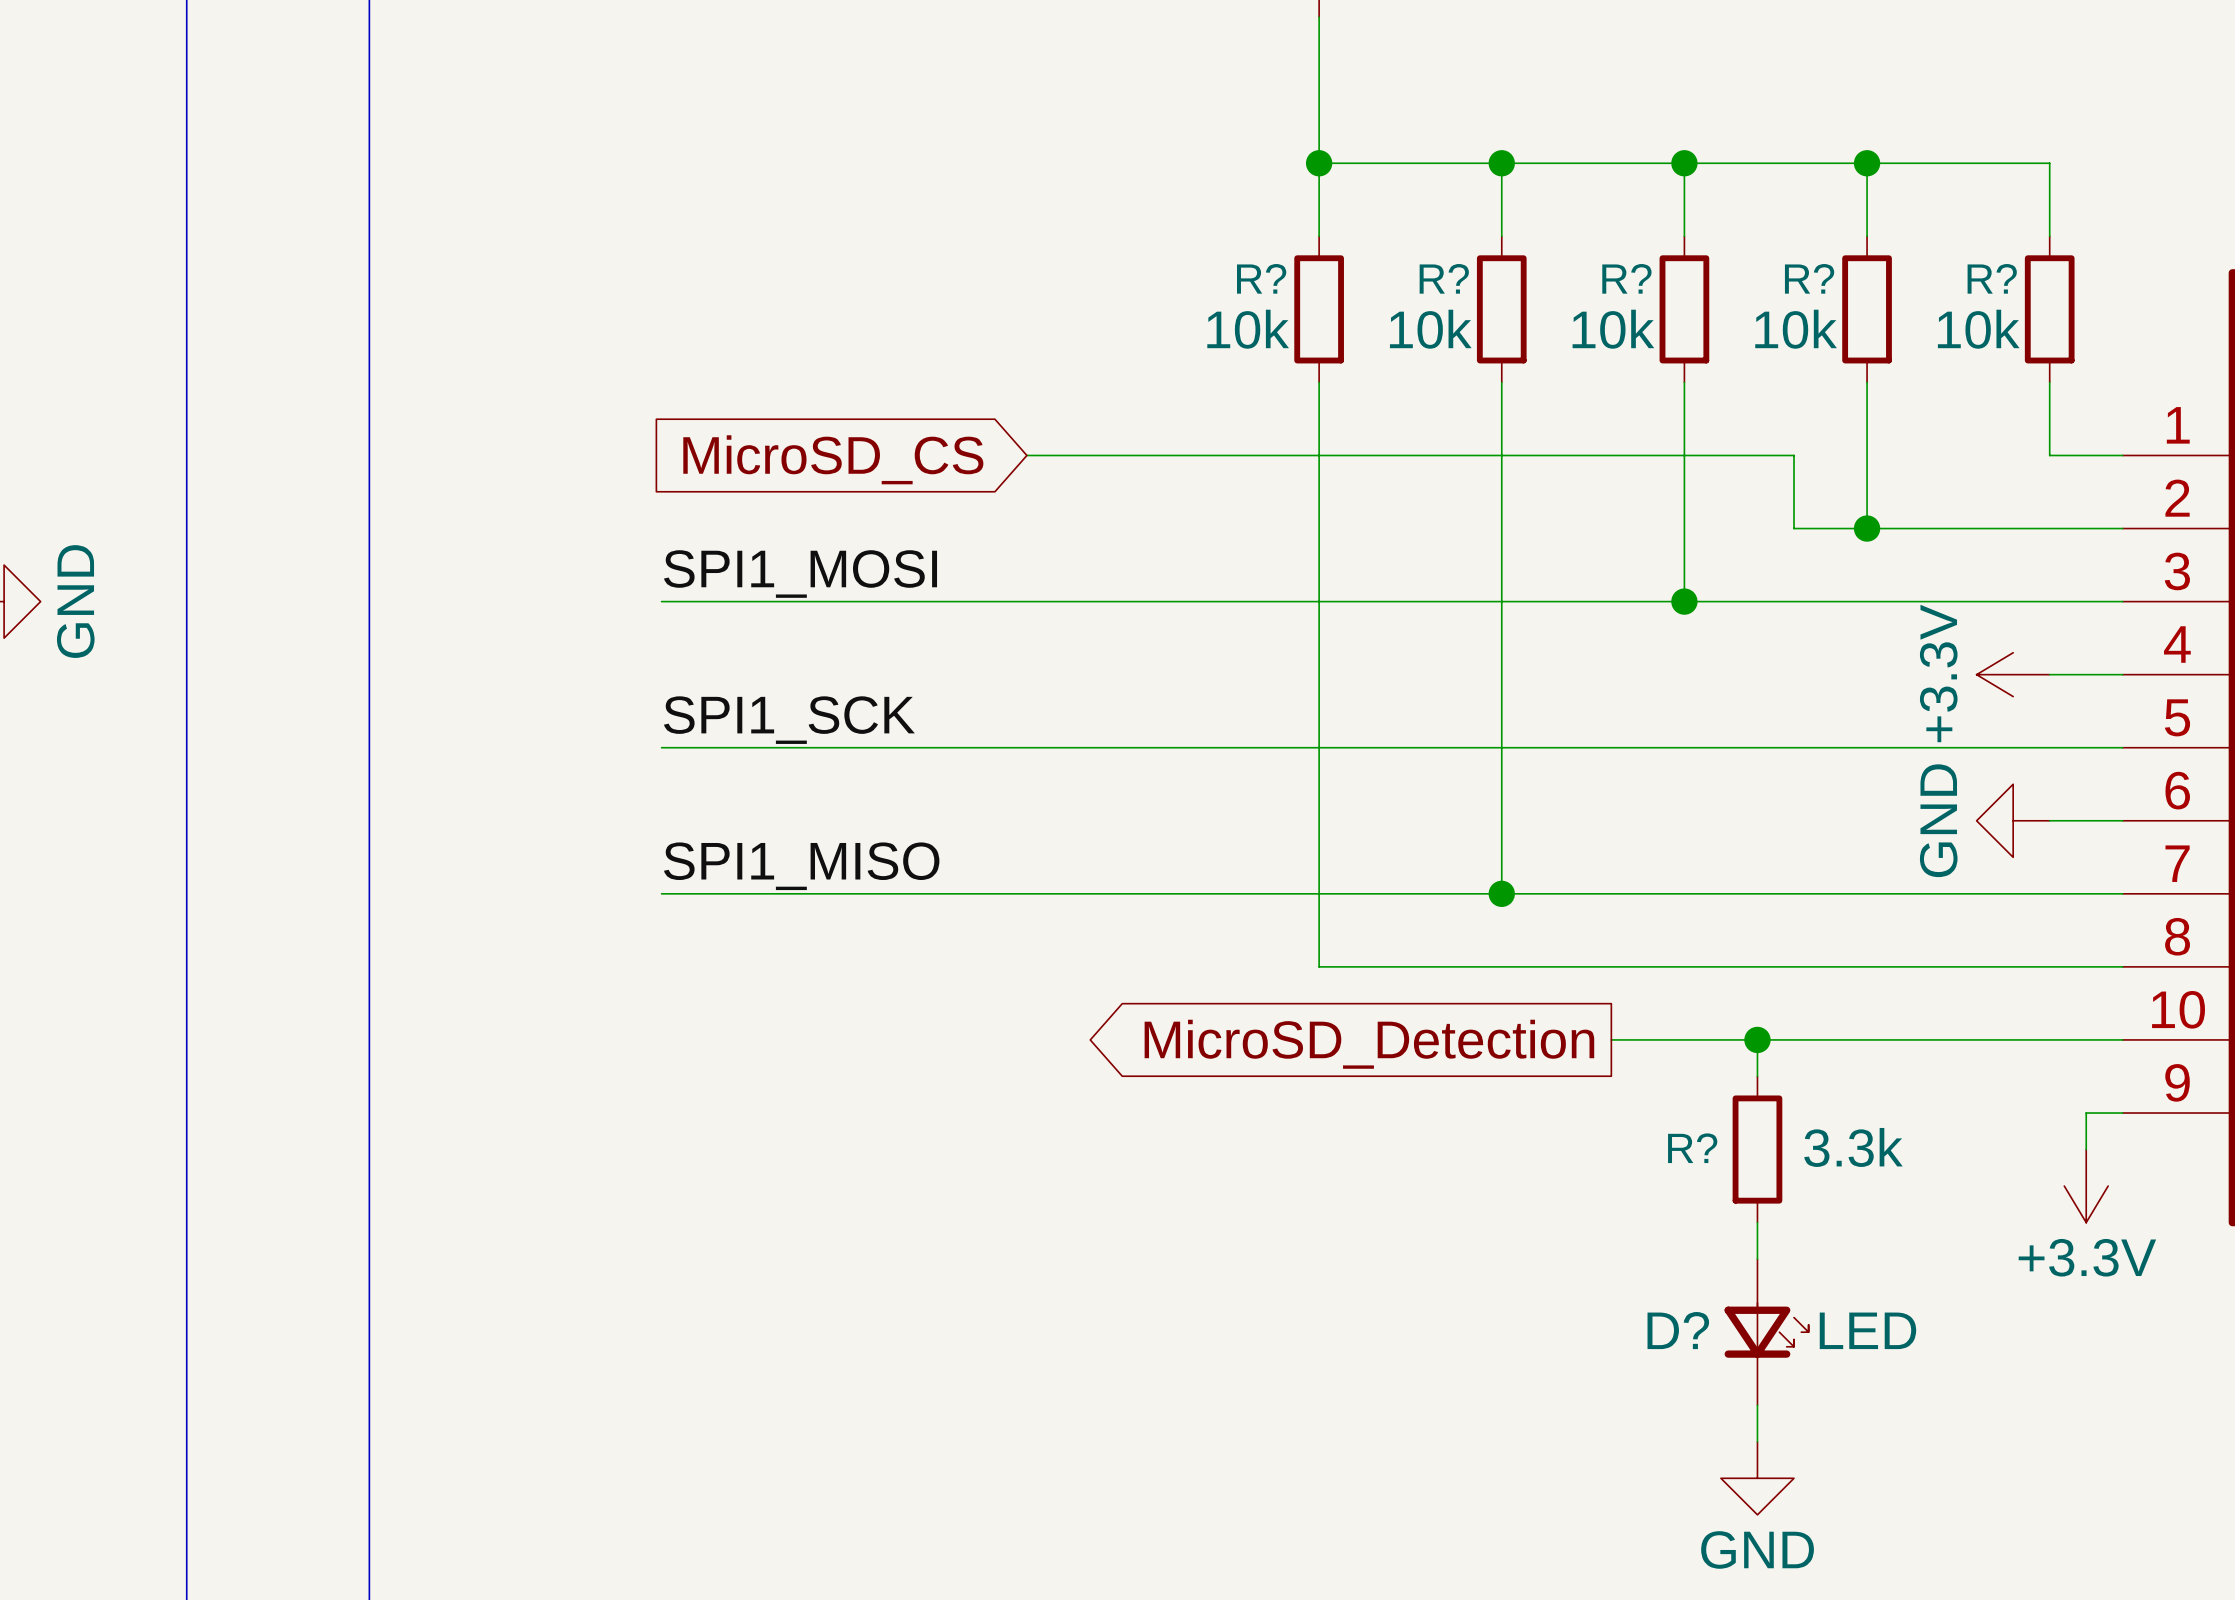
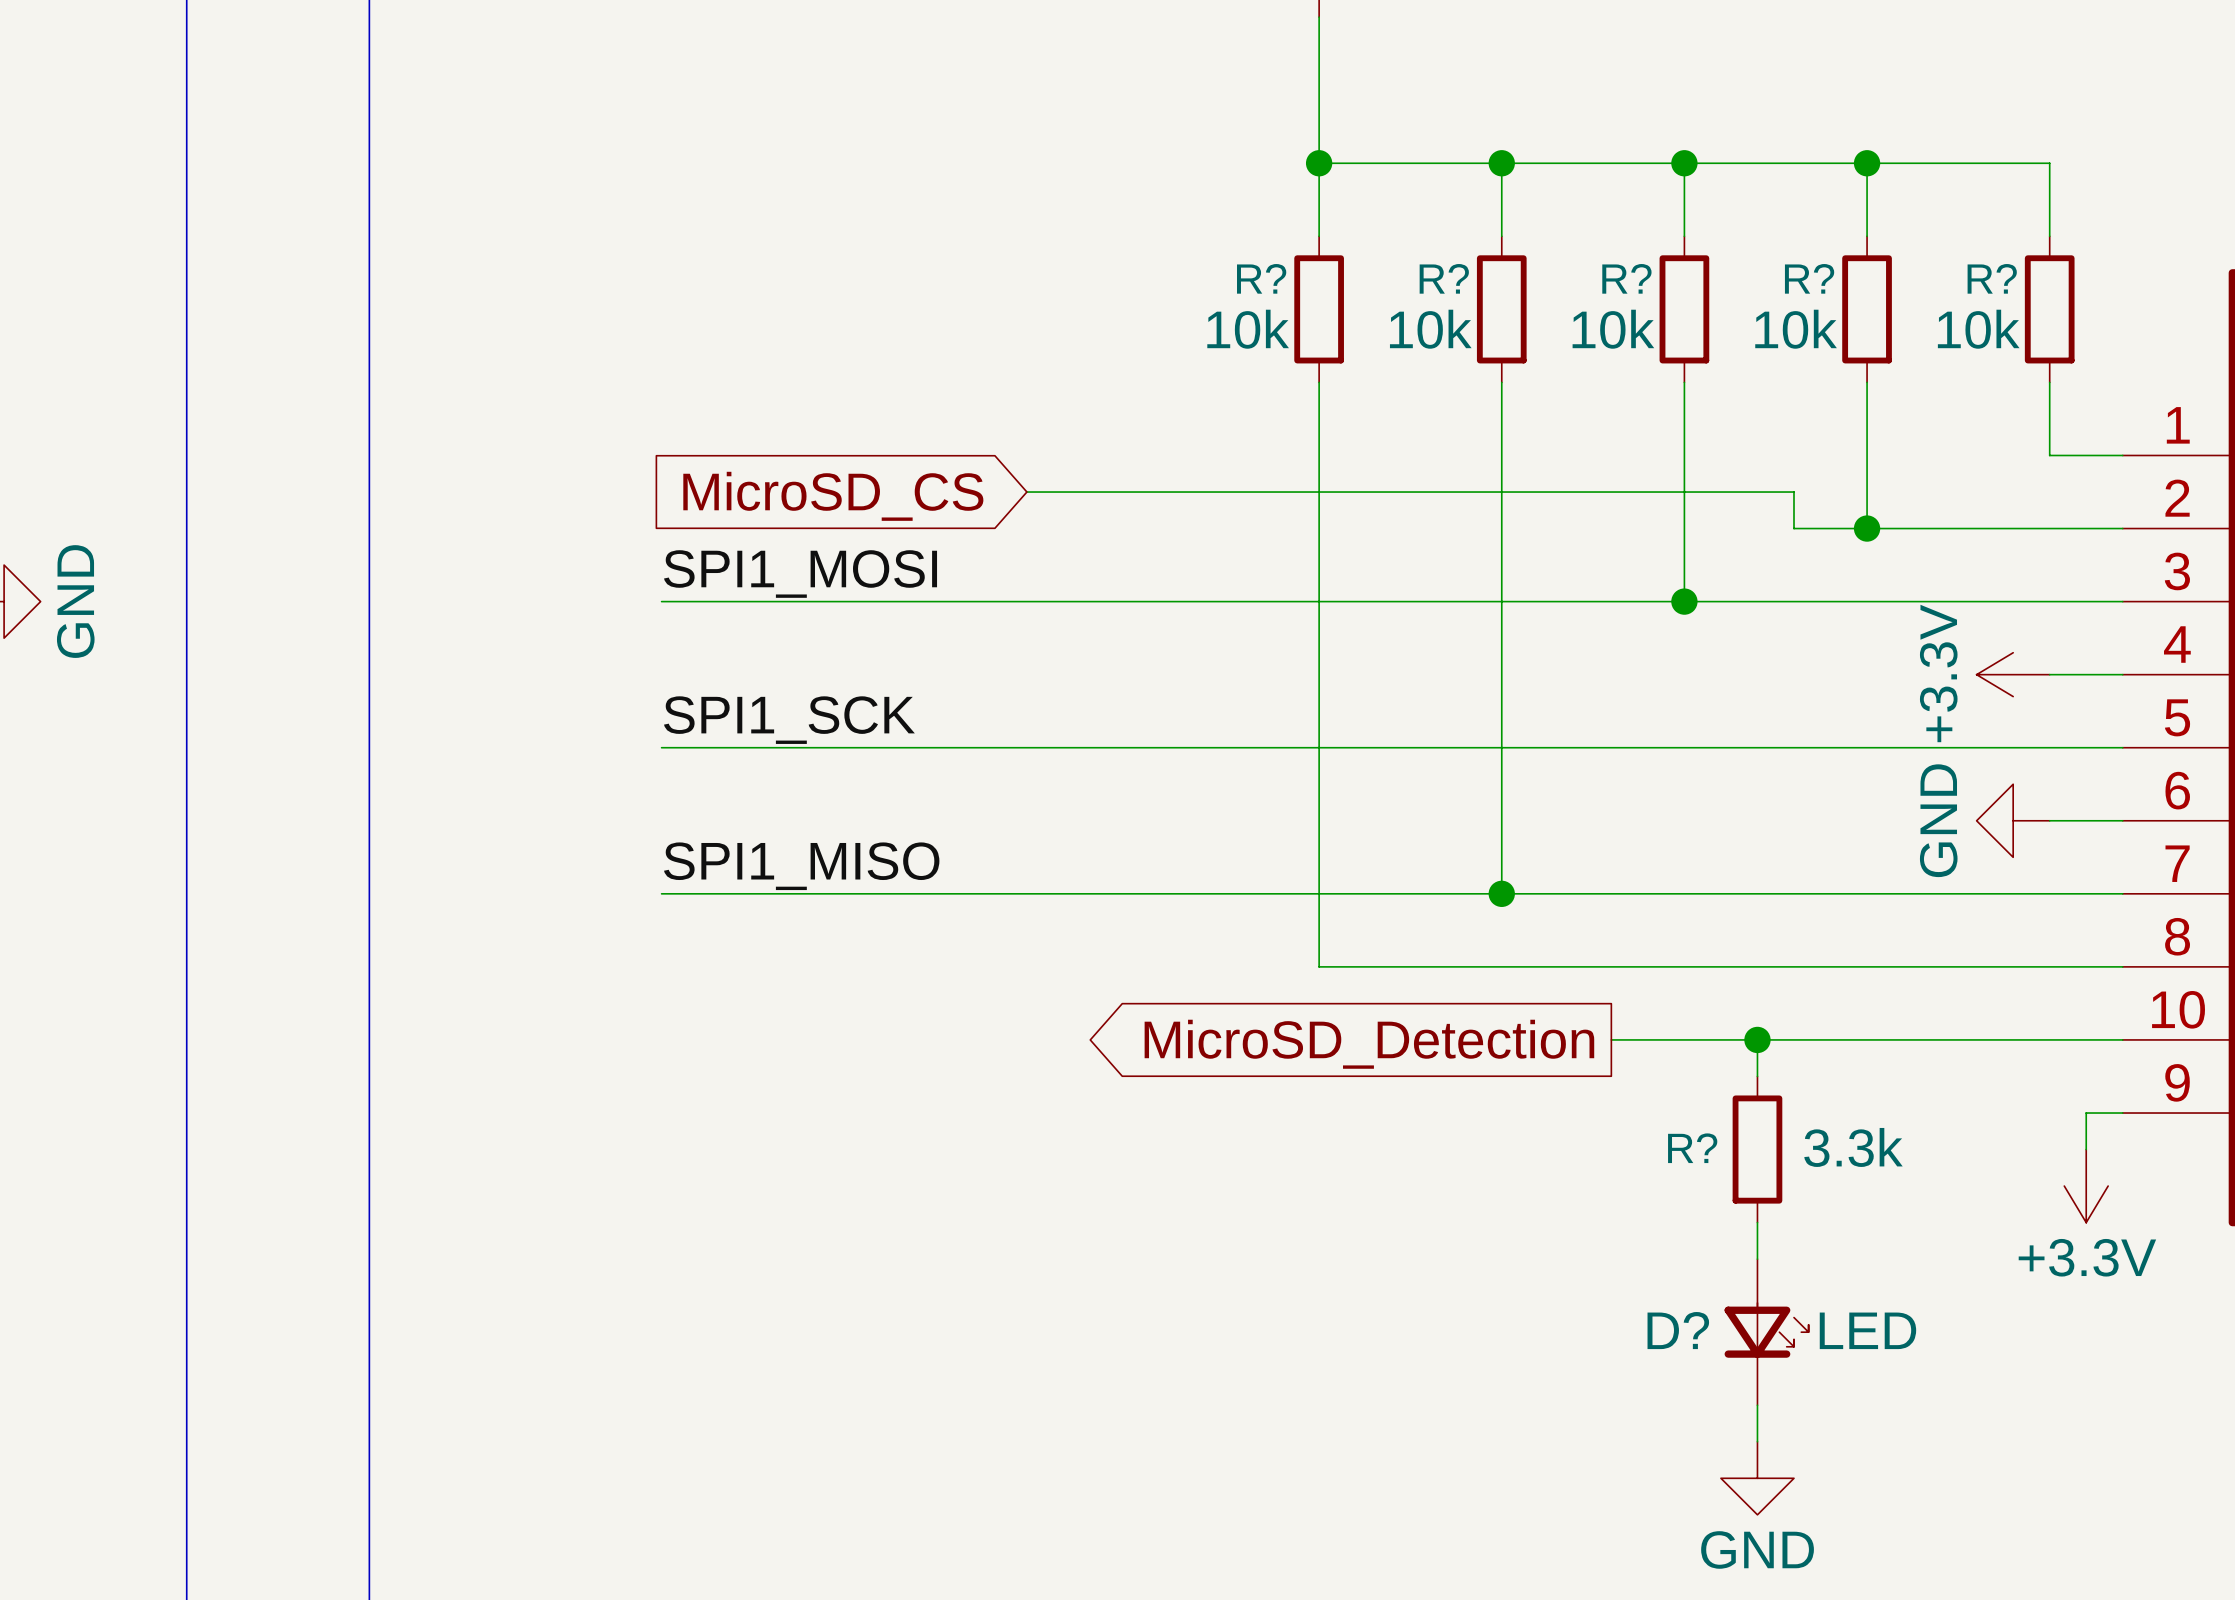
wire: (1026, 455) (1793, 455) (1793, 492) -> (1026, 492) (1793, 492)
global label position: MicroSD_CS (833, 459) -> MicroSD_CS (833, 496)

